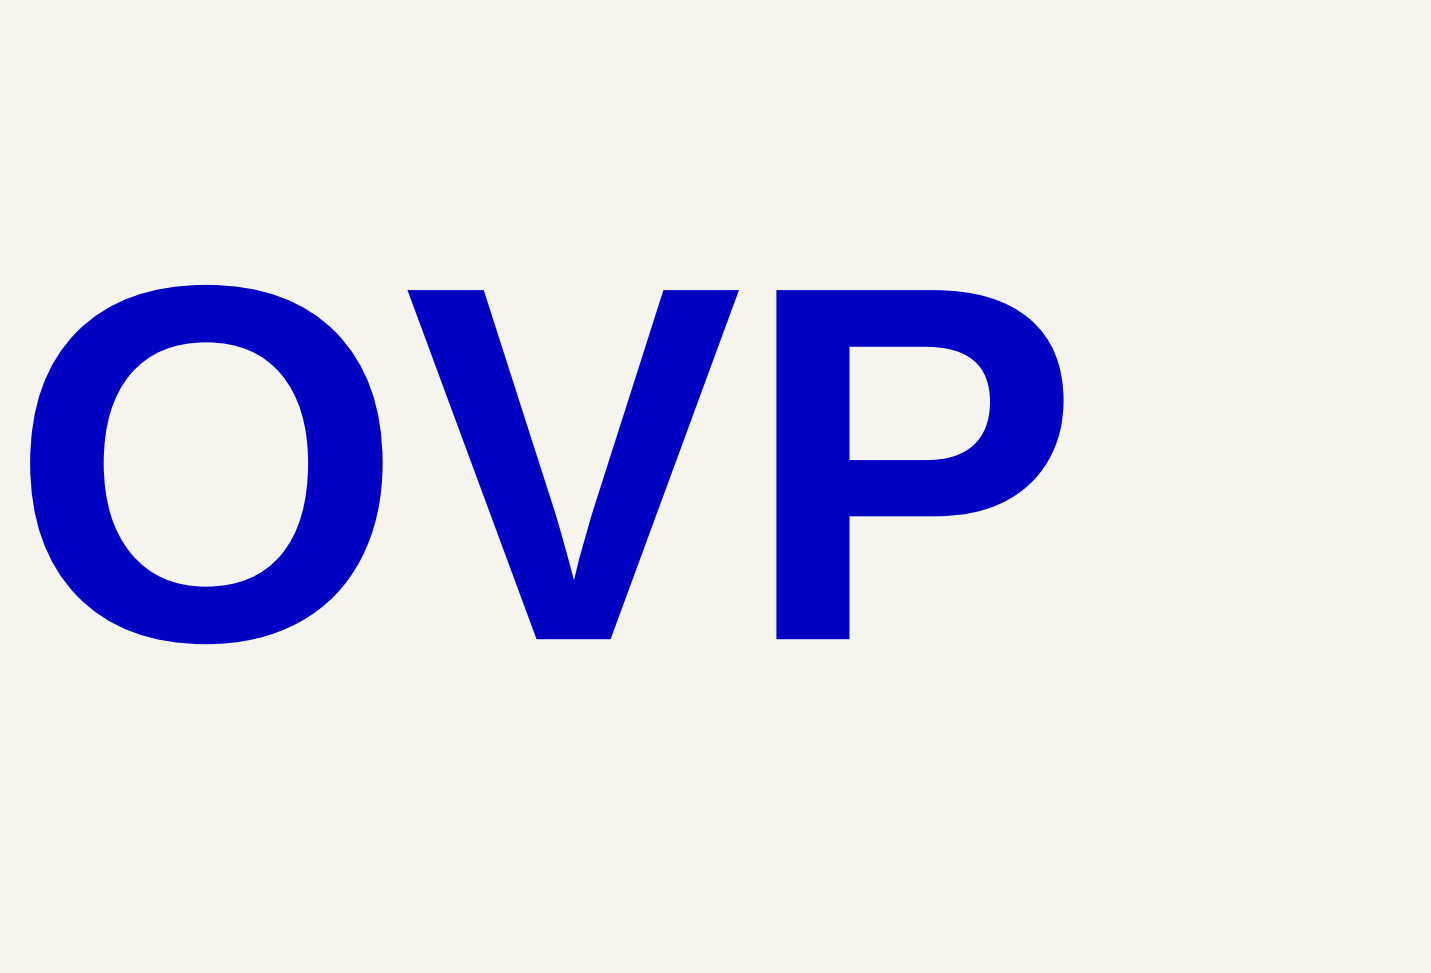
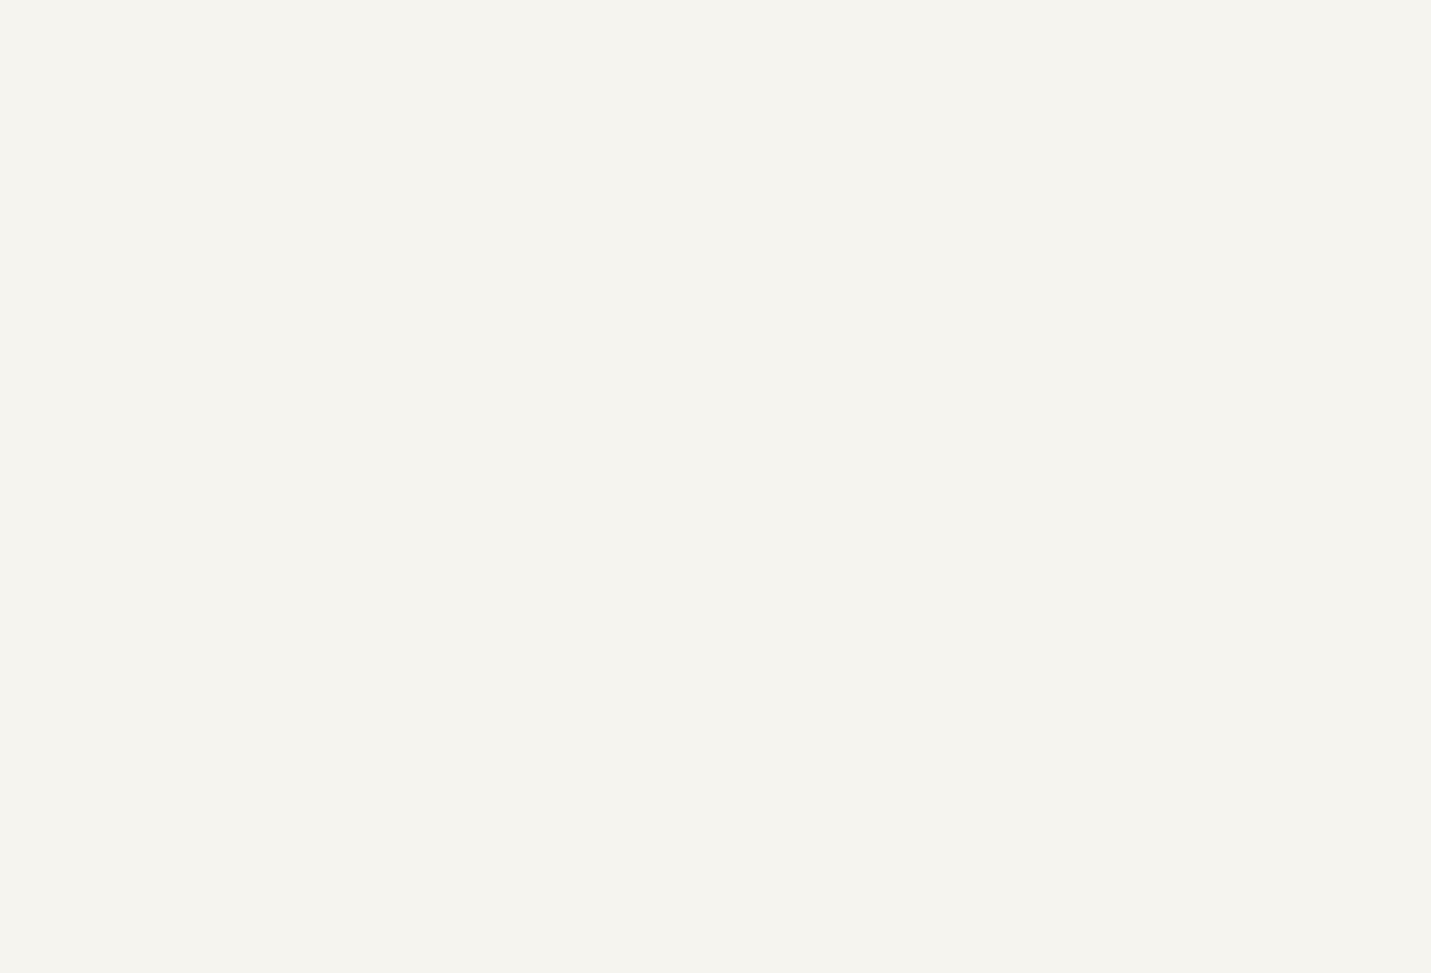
text: OVP (546, 464) -> none

